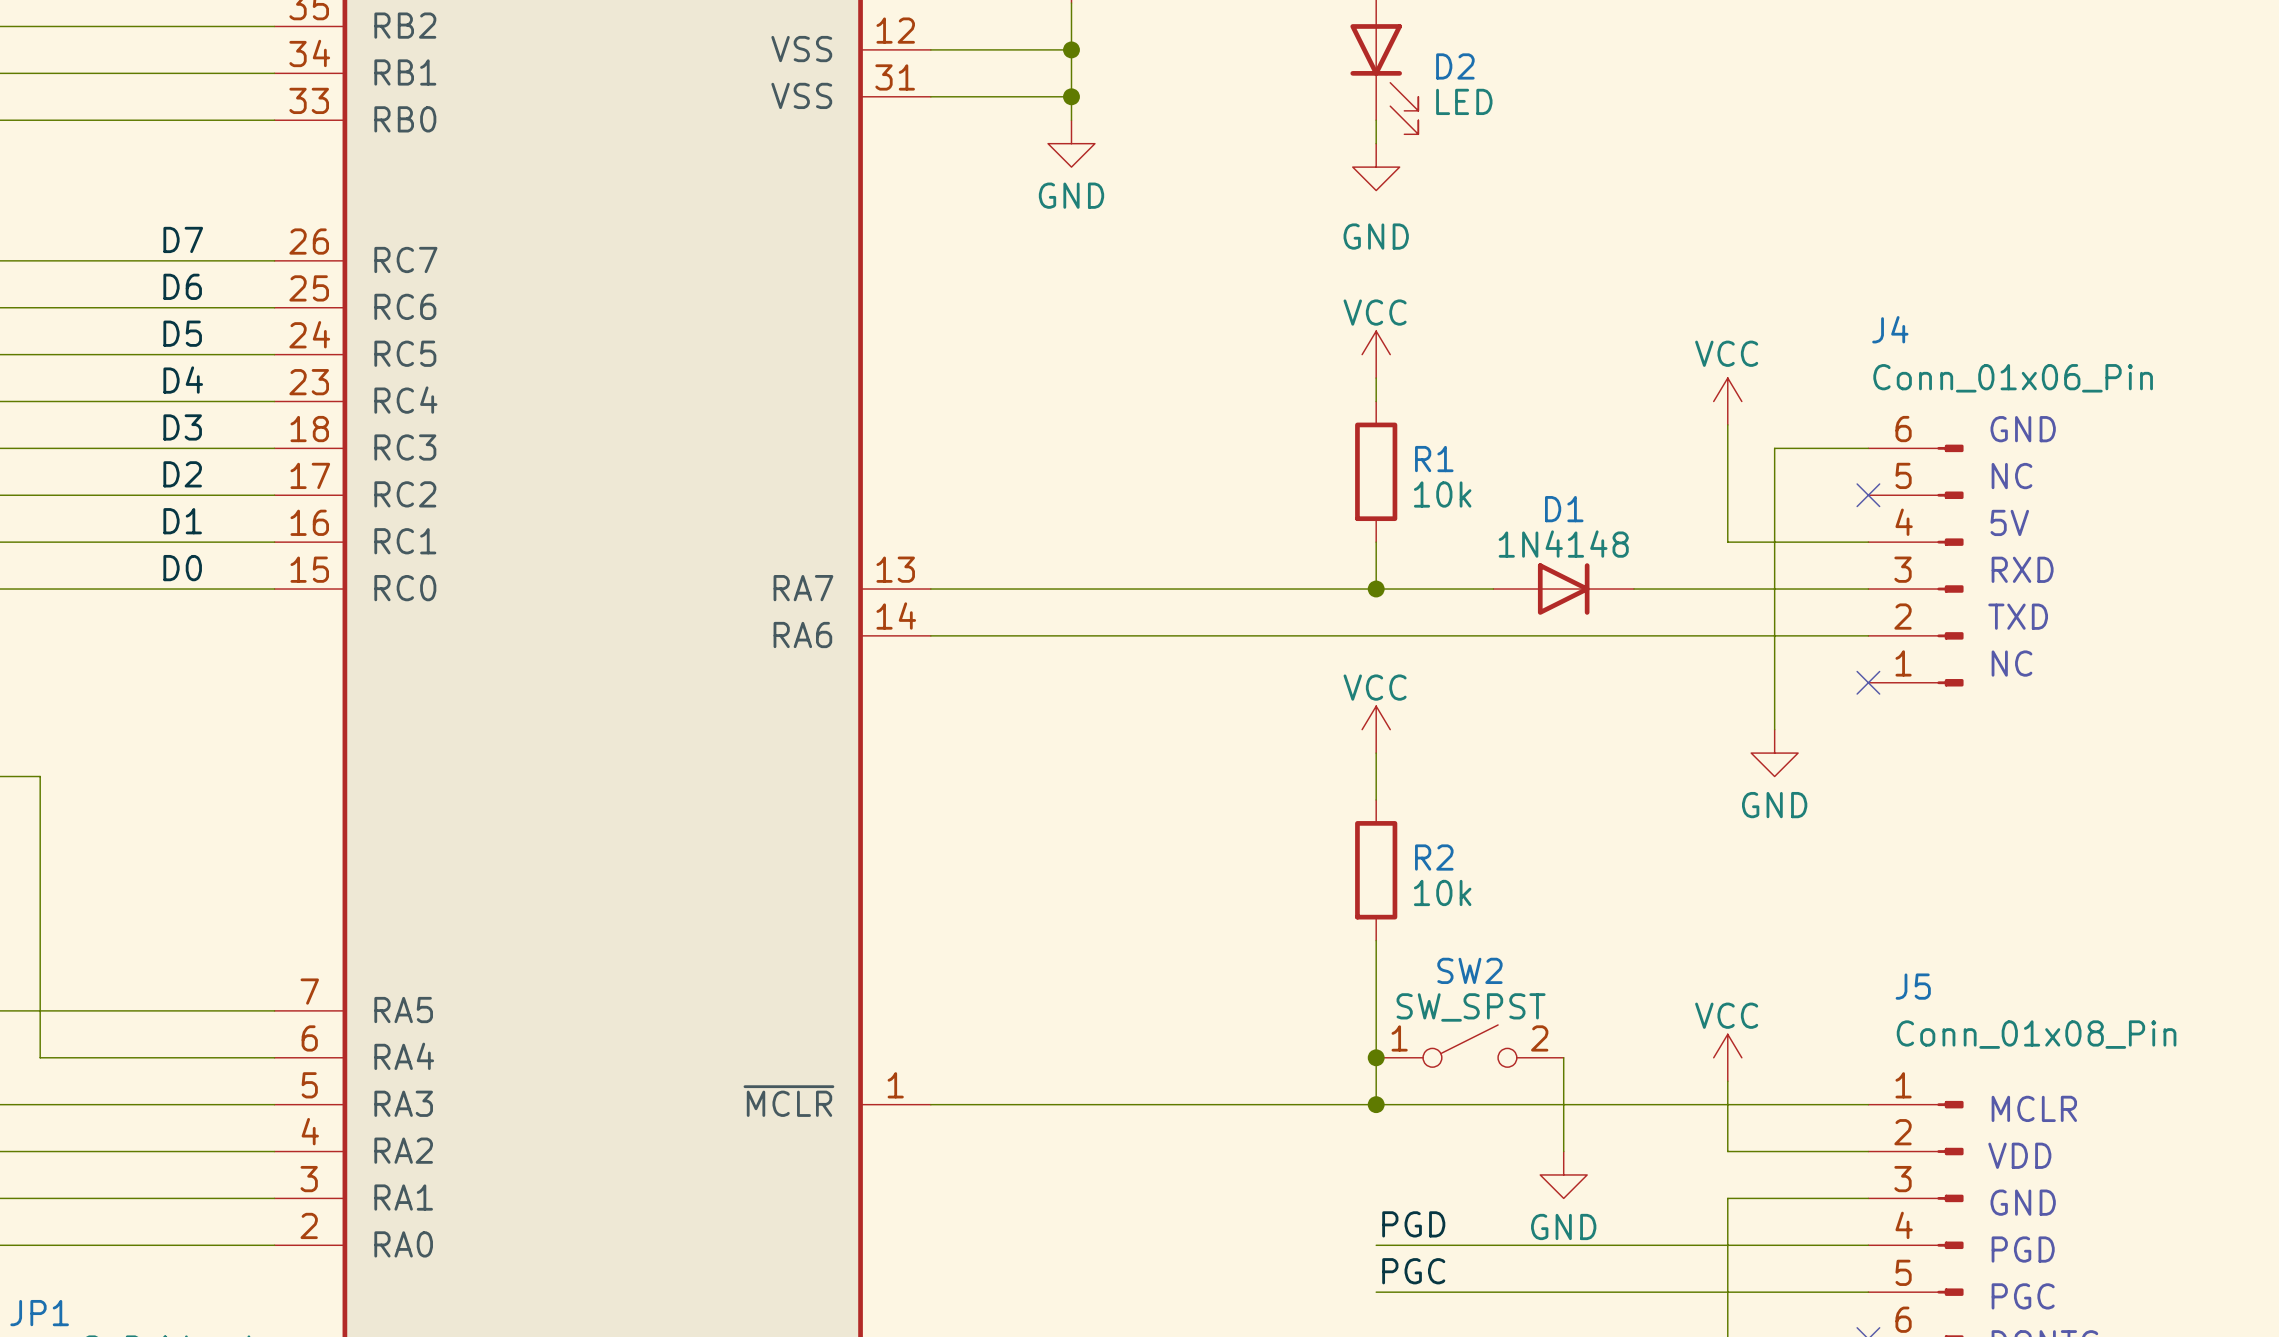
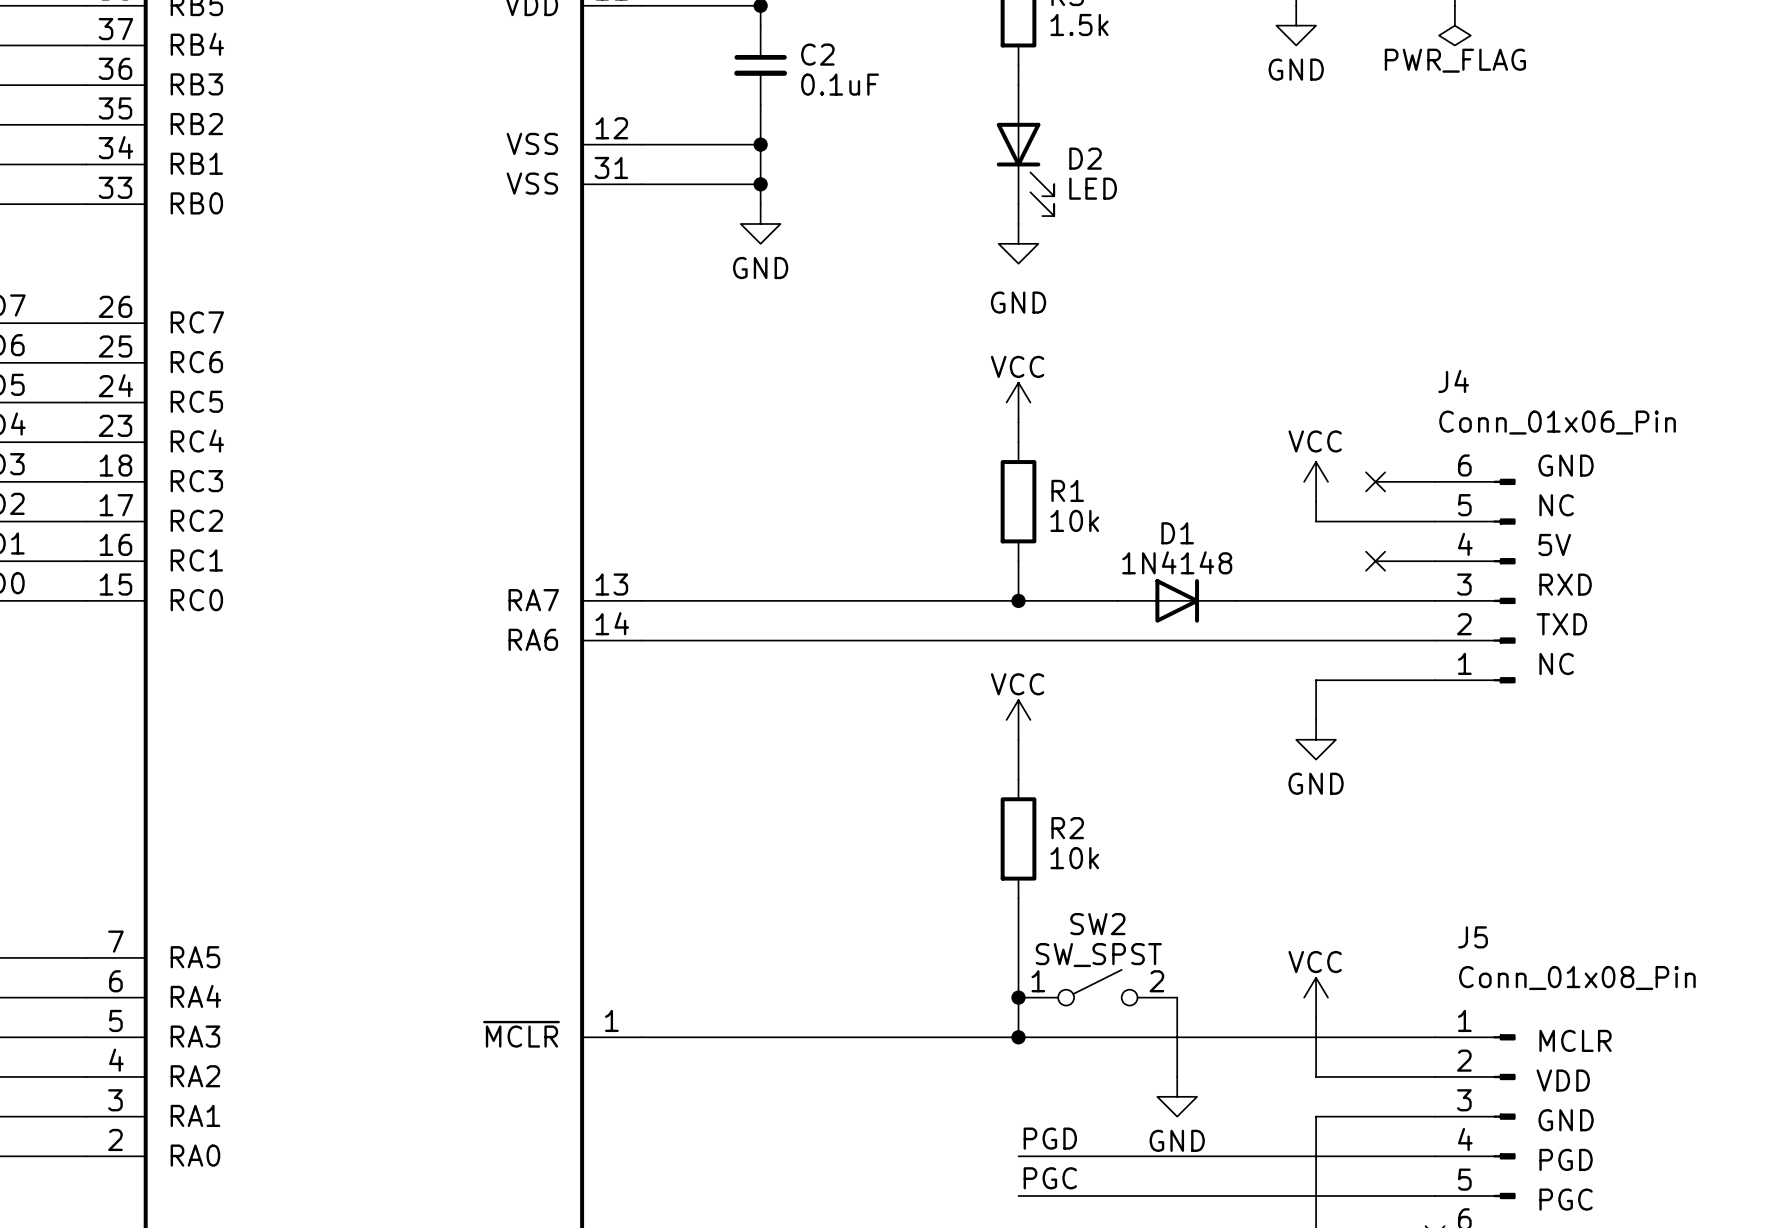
power symbol position: VCC (1727, 401) -> VCC (1316, 481)
wire: (1798, 448) (1774, 448) (1774, 729) -> none
no-connect mark: none -> (1375, 481)
wire: (1727, 495) (1727, 542) (1798, 542) -> (1316, 521) (1435, 521)
no-connect mark: (1868, 495) -> none
no-connect mark: none -> (1375, 561)
wire: none -> (1435, 680) (1316, 680) (1316, 719)
no-connect mark: (1868, 682) -> none
power symbol position: GND (1774, 753) -> GND (1316, 739)

